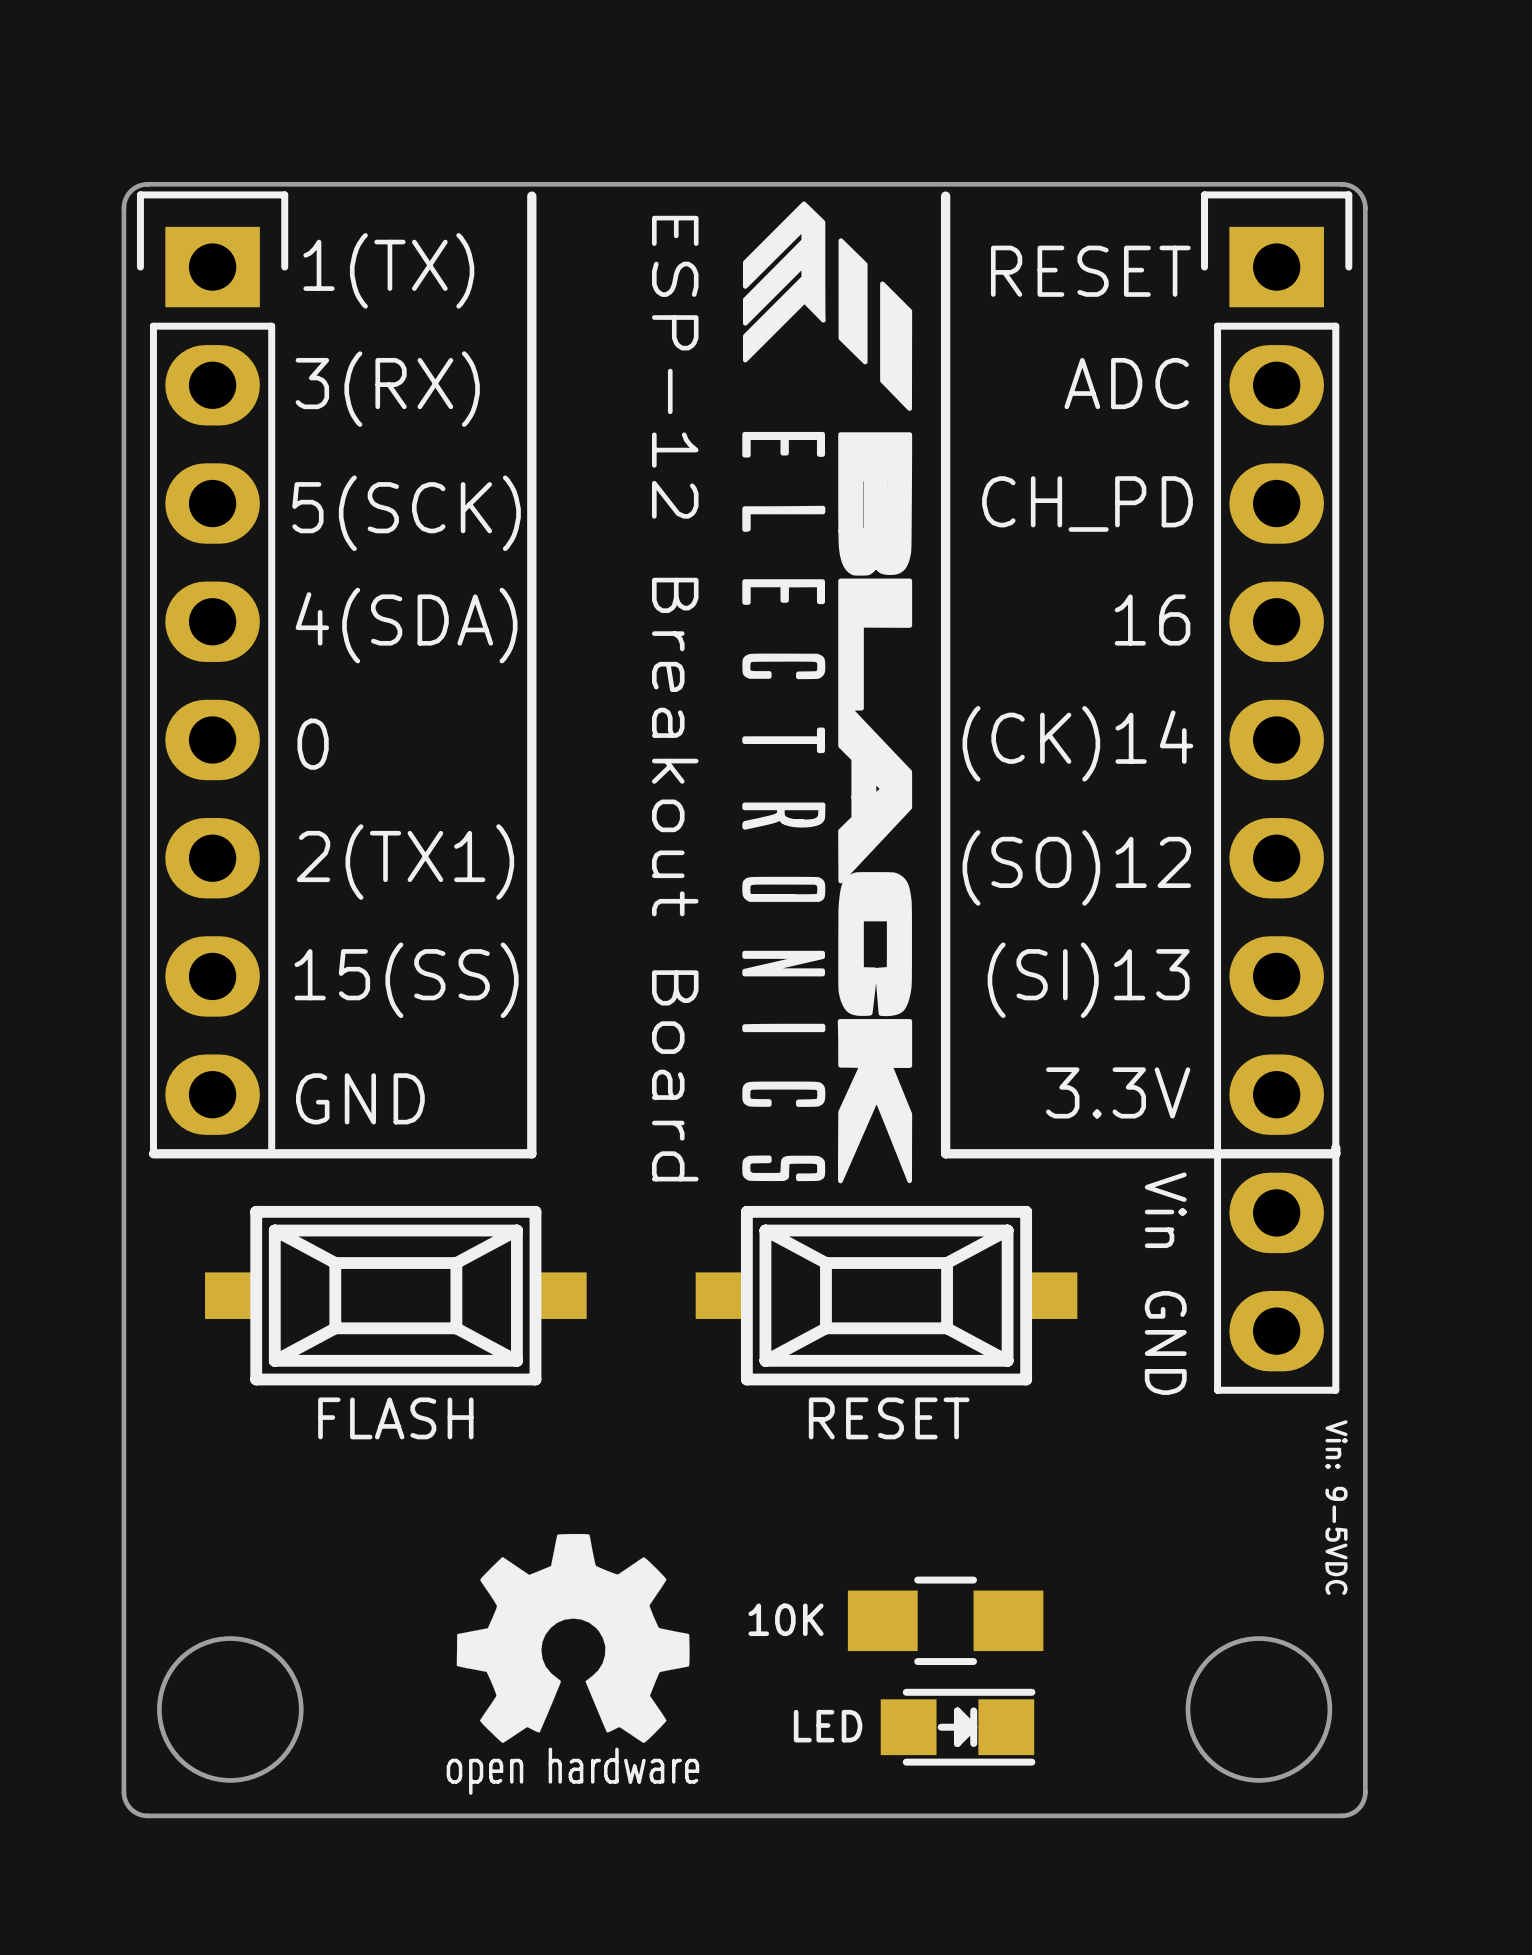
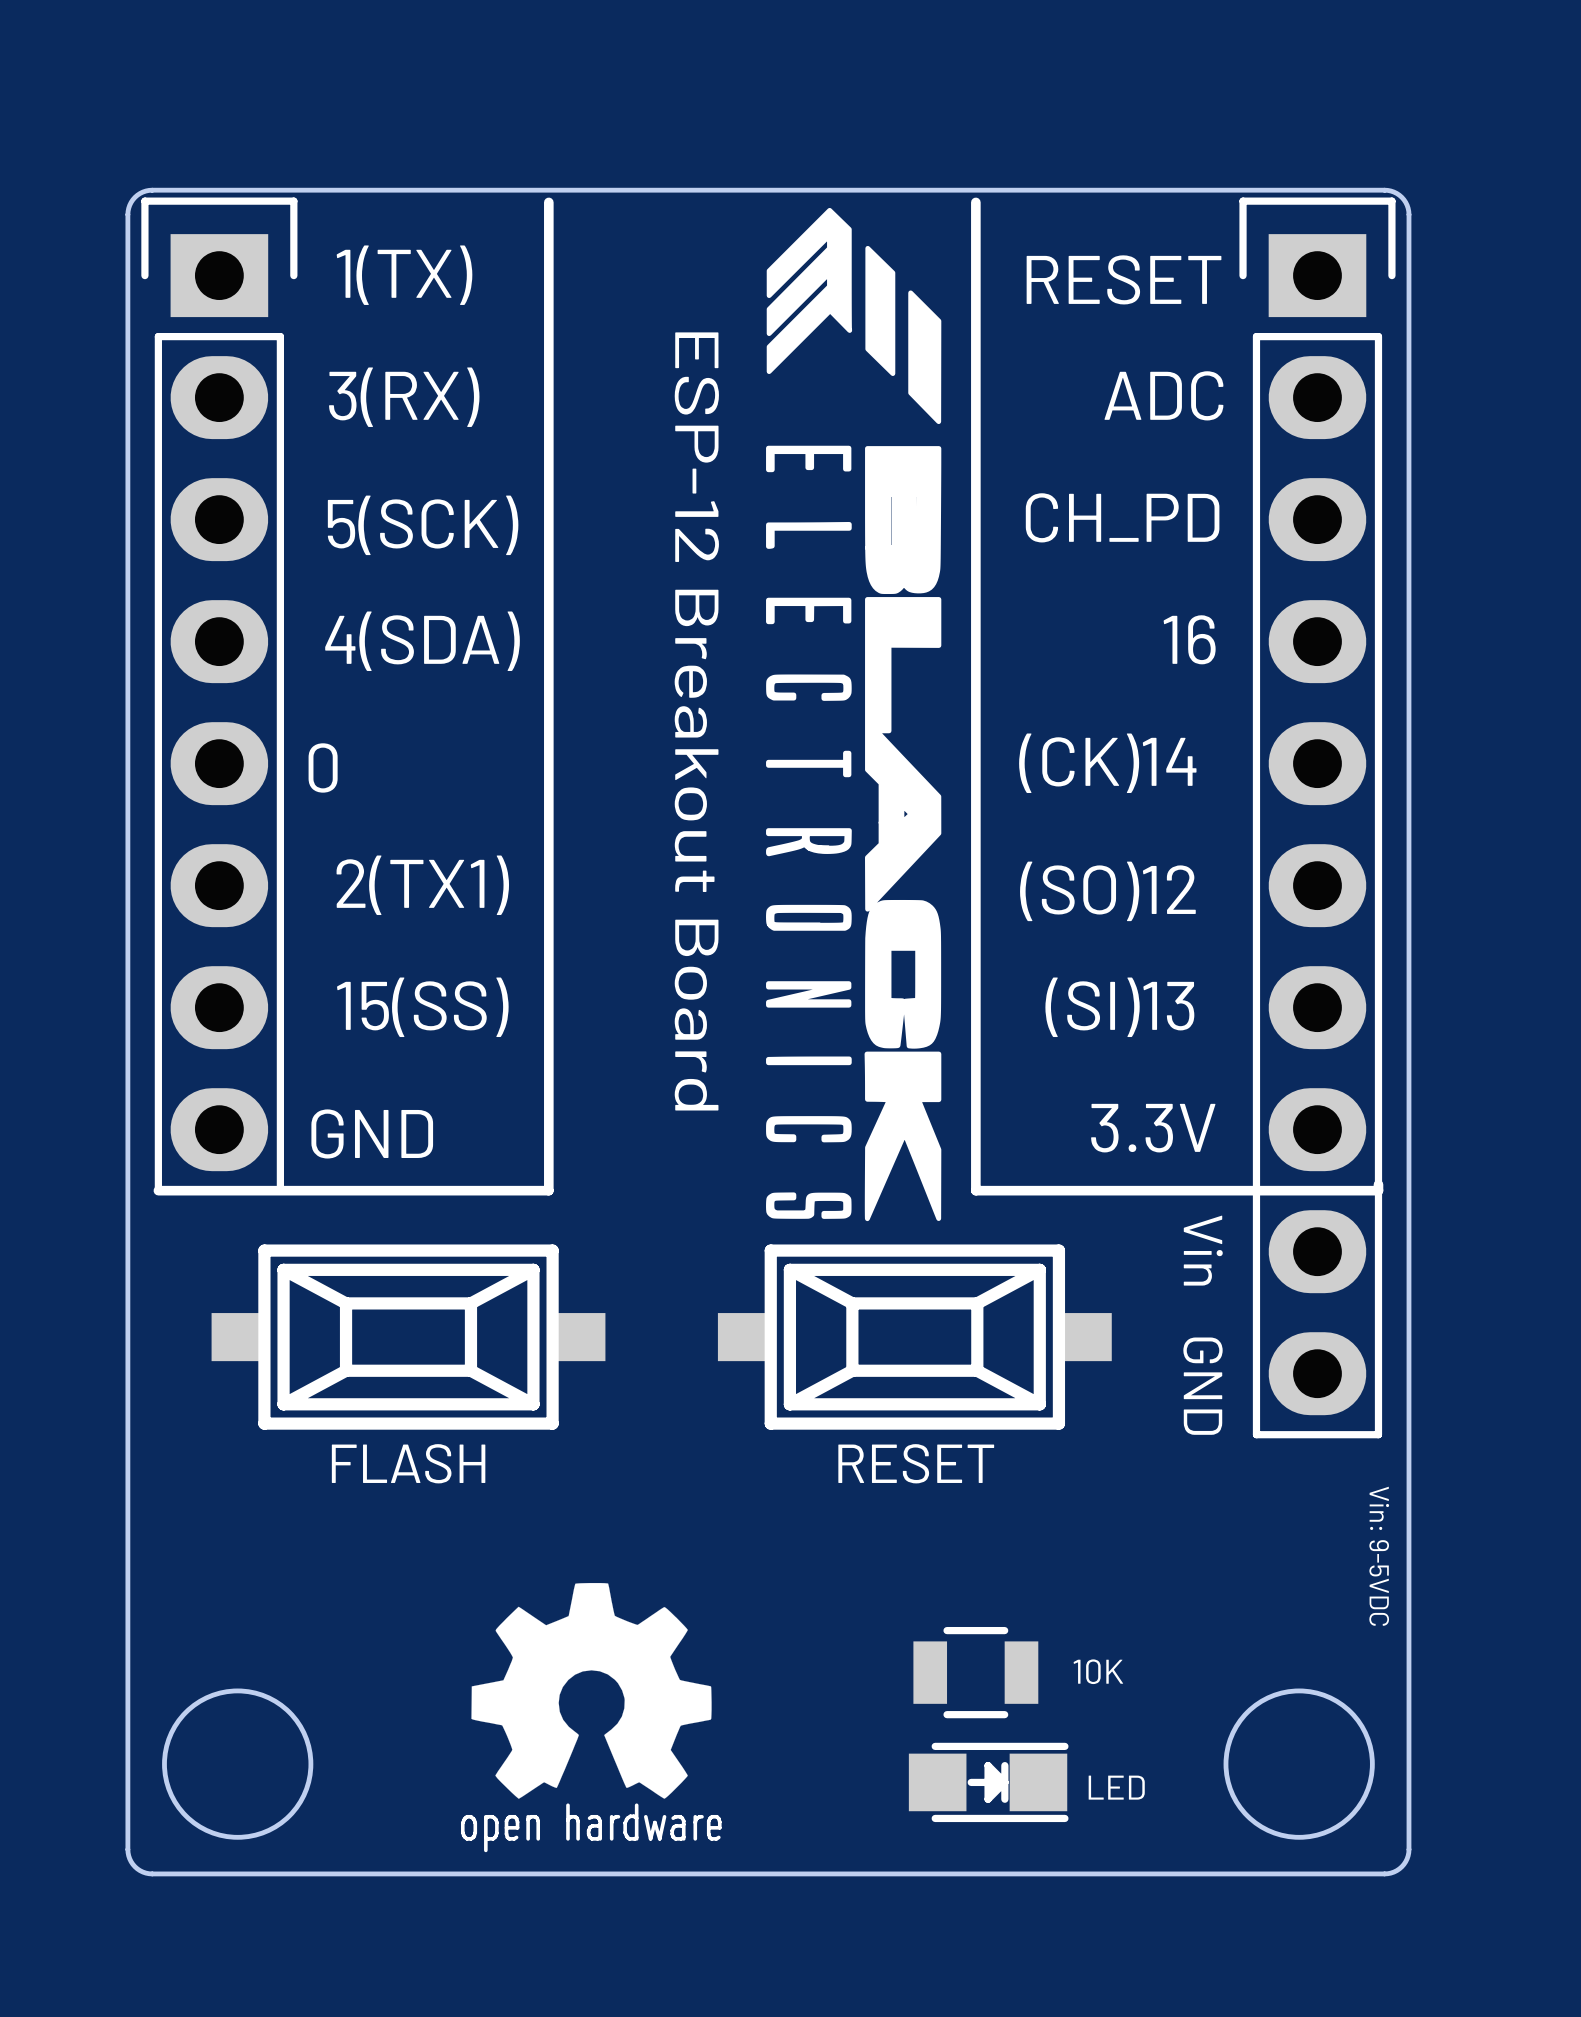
part footprint: [847, 1576, 1044, 1666] -> [913, 1626, 1039, 1719]
part value position: 10K (786, 1619) -> 10K (1098, 1671)
part value position: LED (828, 1726) -> LED (1116, 1787)

